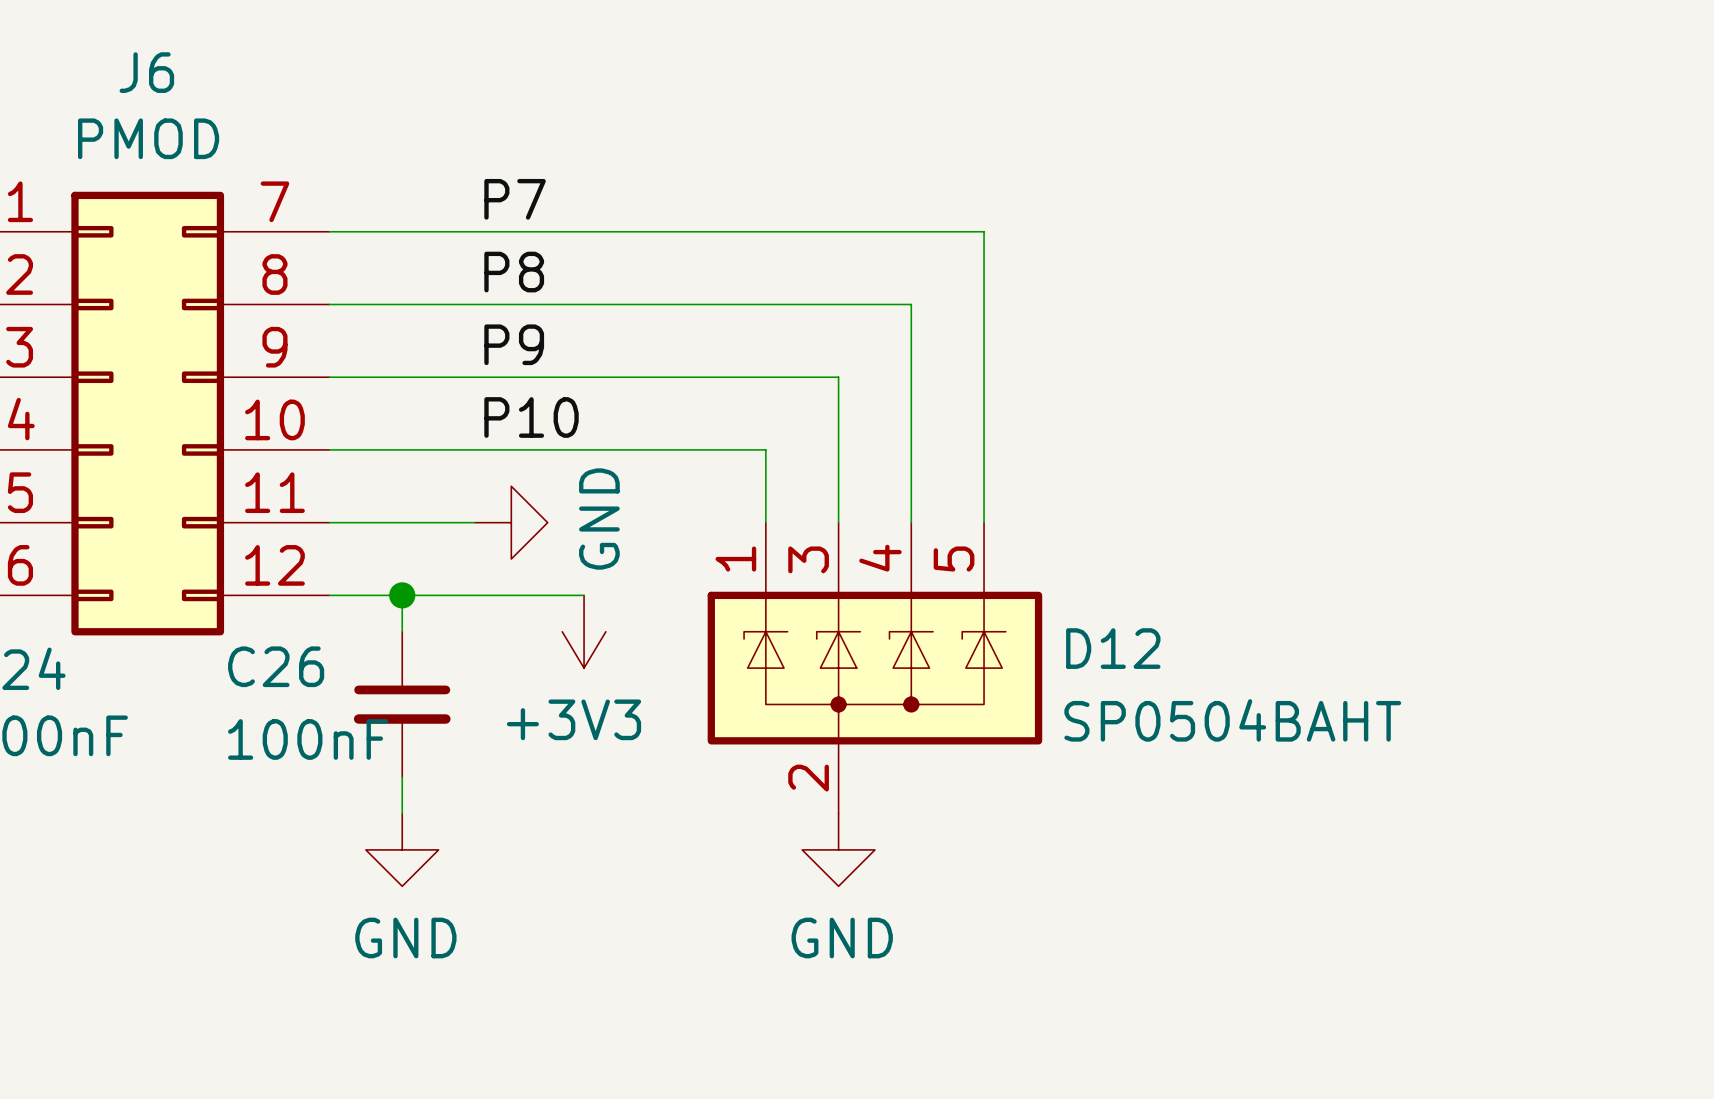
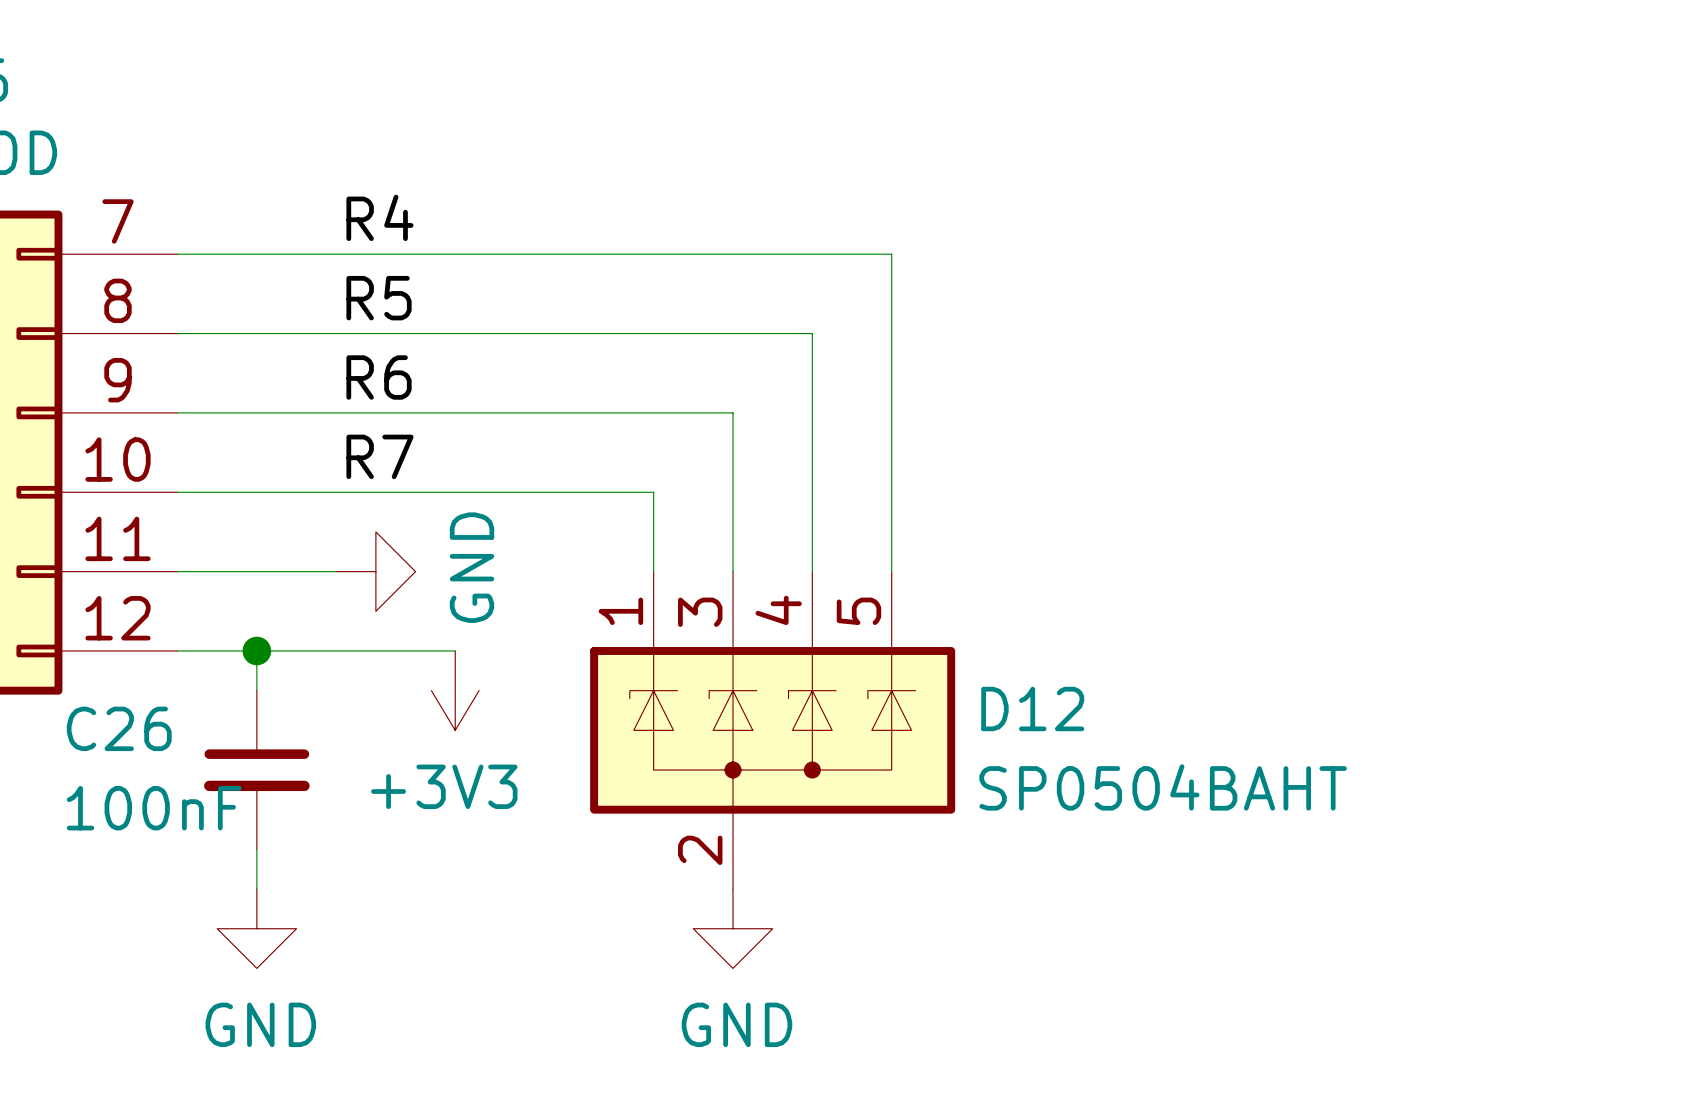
label: P7 (515, 199) -> R4 (379, 217)
label: P8 (514, 272) -> R5 (379, 298)
label: P9 (514, 344) -> R6 (379, 377)
label: P10 (531, 417) -> R7 (379, 456)

